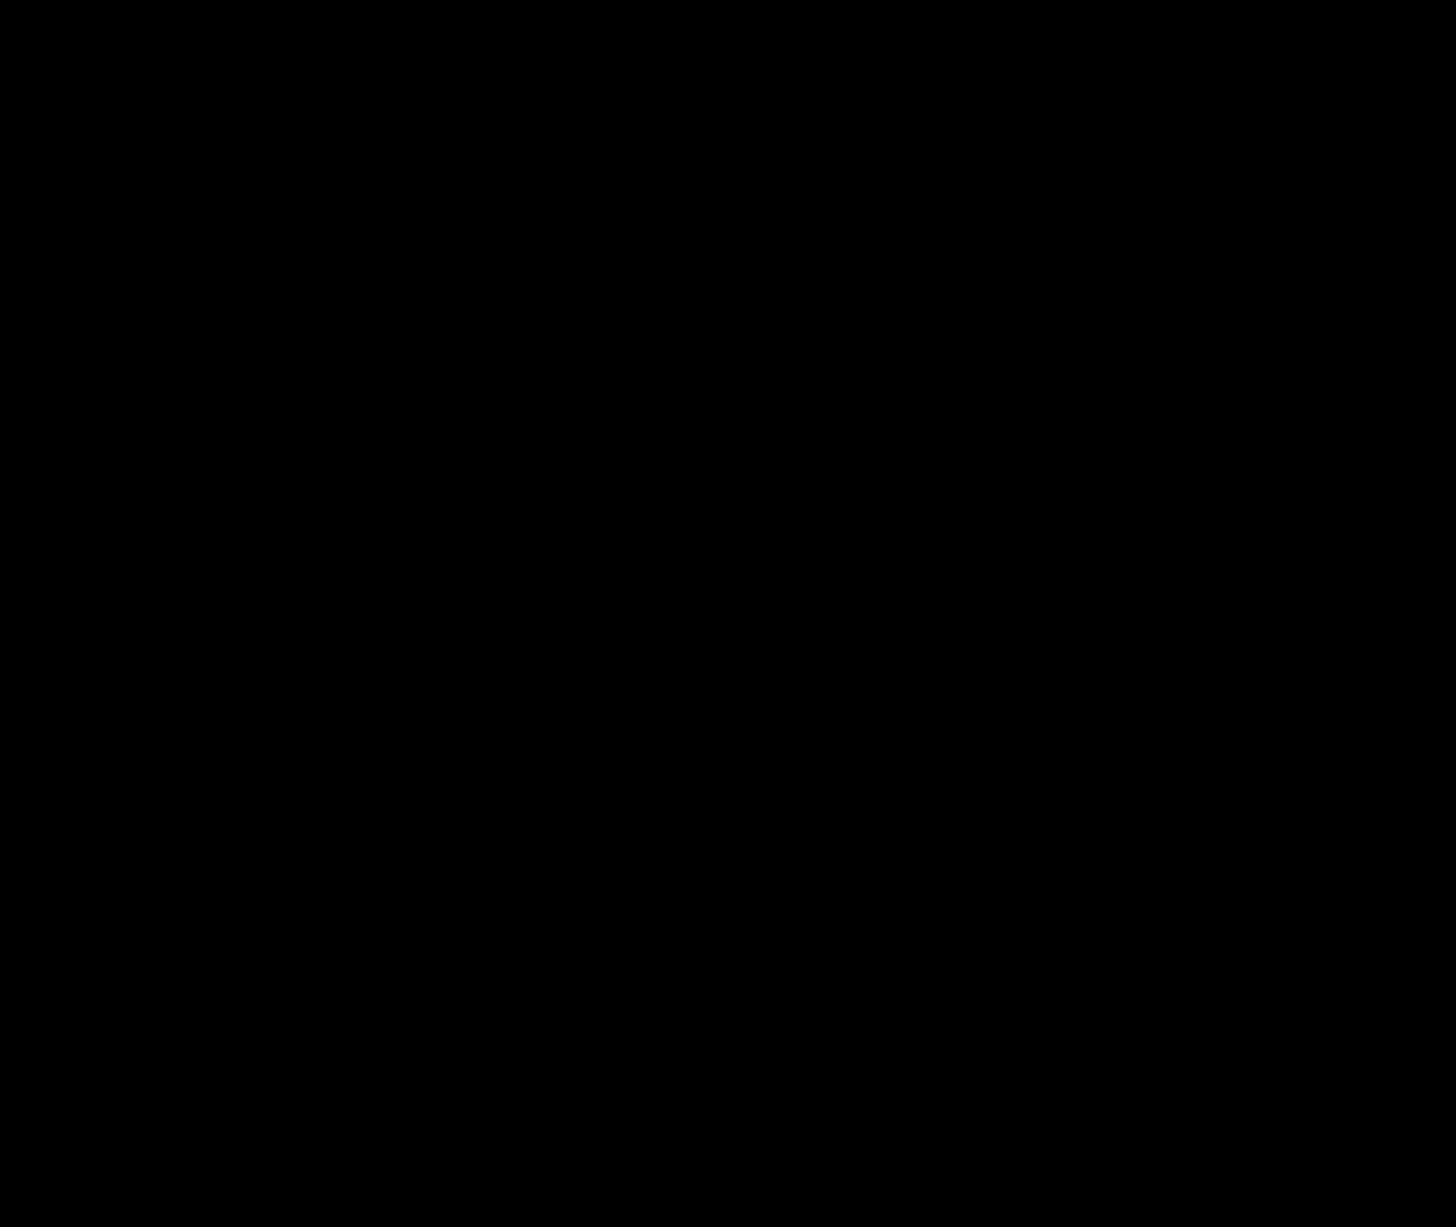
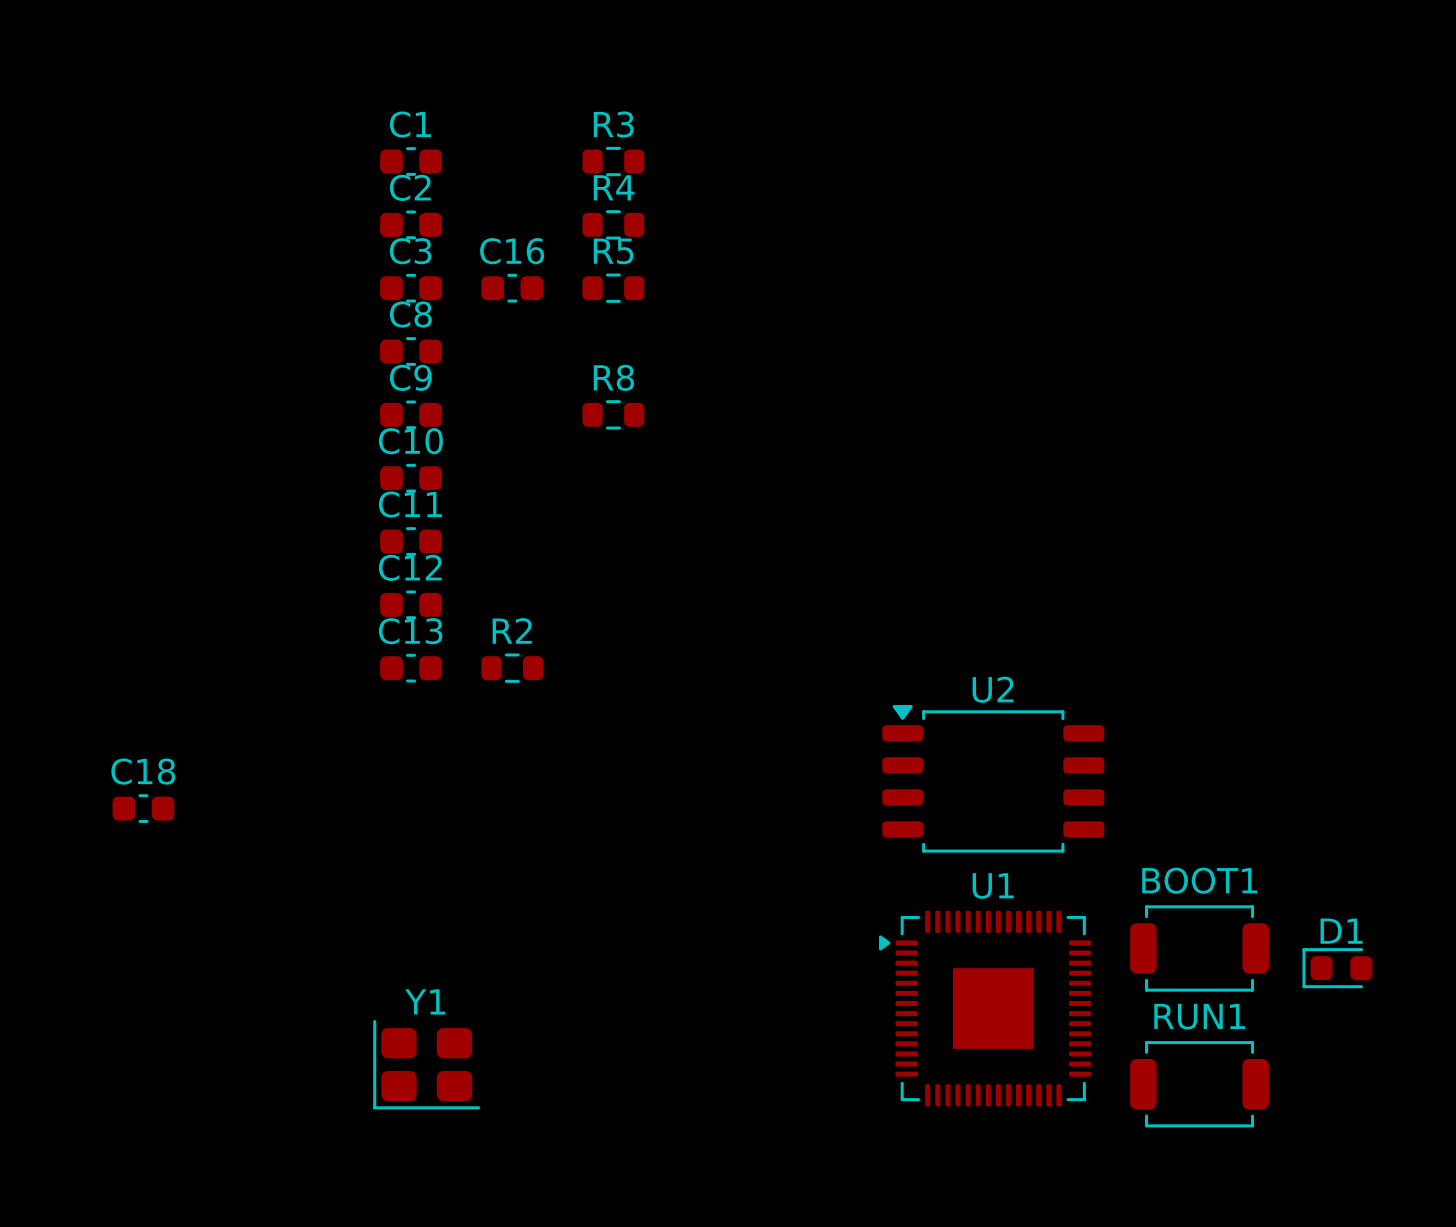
C1: none -> (411, 161)
R3: none -> (613, 161)
C2: none -> (411, 224)
R4: none -> (613, 224)
C3: none -> (411, 288)
C16: none -> (512, 288)
R5: none -> (613, 288)
C8: none -> (411, 351)
C9: none -> (411, 414)
R8: none -> (613, 414)
C10: none -> (411, 478)
C11: none -> (411, 541)
C12: none -> (411, 604)
C13: none -> (411, 668)
R2: none -> (512, 668)
U2: none -> (993, 778)
C18: none -> (143, 808)
BOOT1: none -> (1199, 948)
D1: none -> (1337, 968)
U1: none -> (985, 1008)
Y1: none -> (426, 1064)
RUN1: none -> (1199, 1084)

